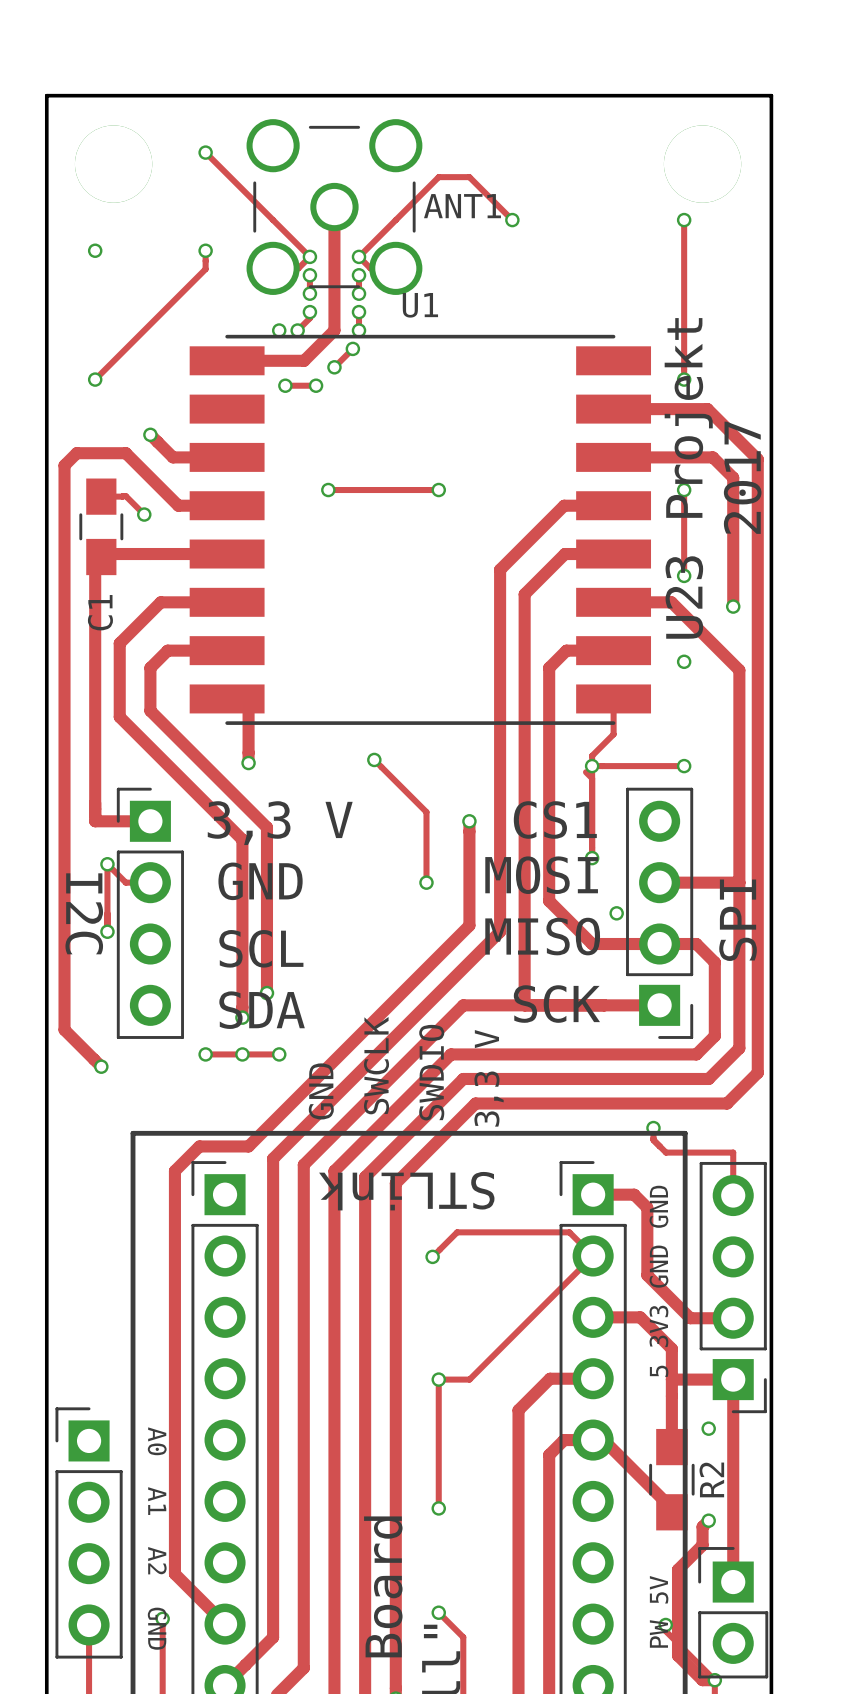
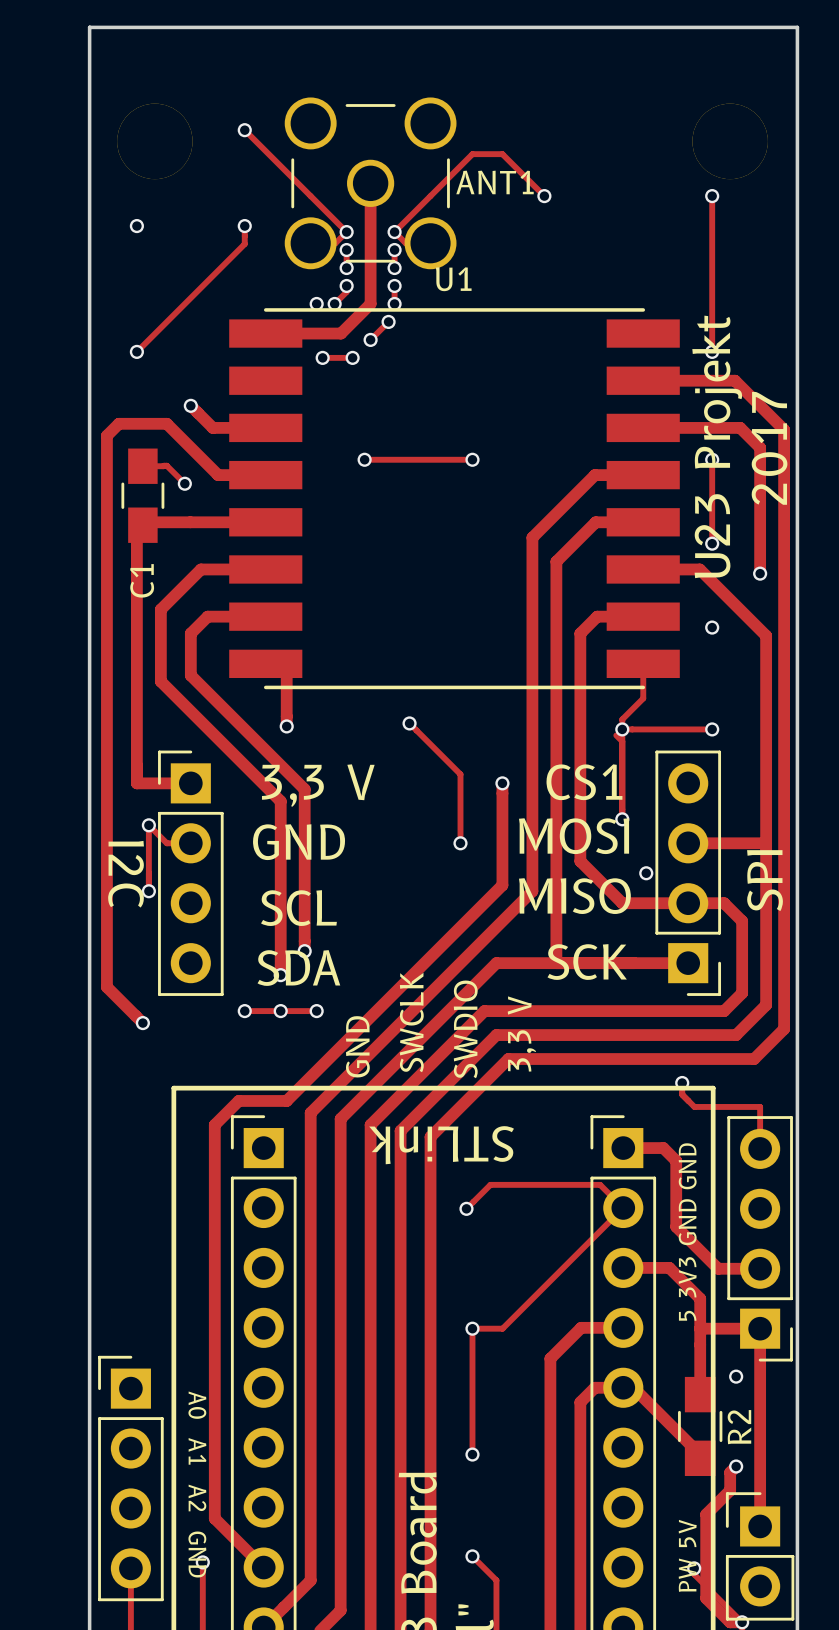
board edge: (46, 95) (771, 95) -> (89, 74) (89, 27) (797, 27) (797, 74)

